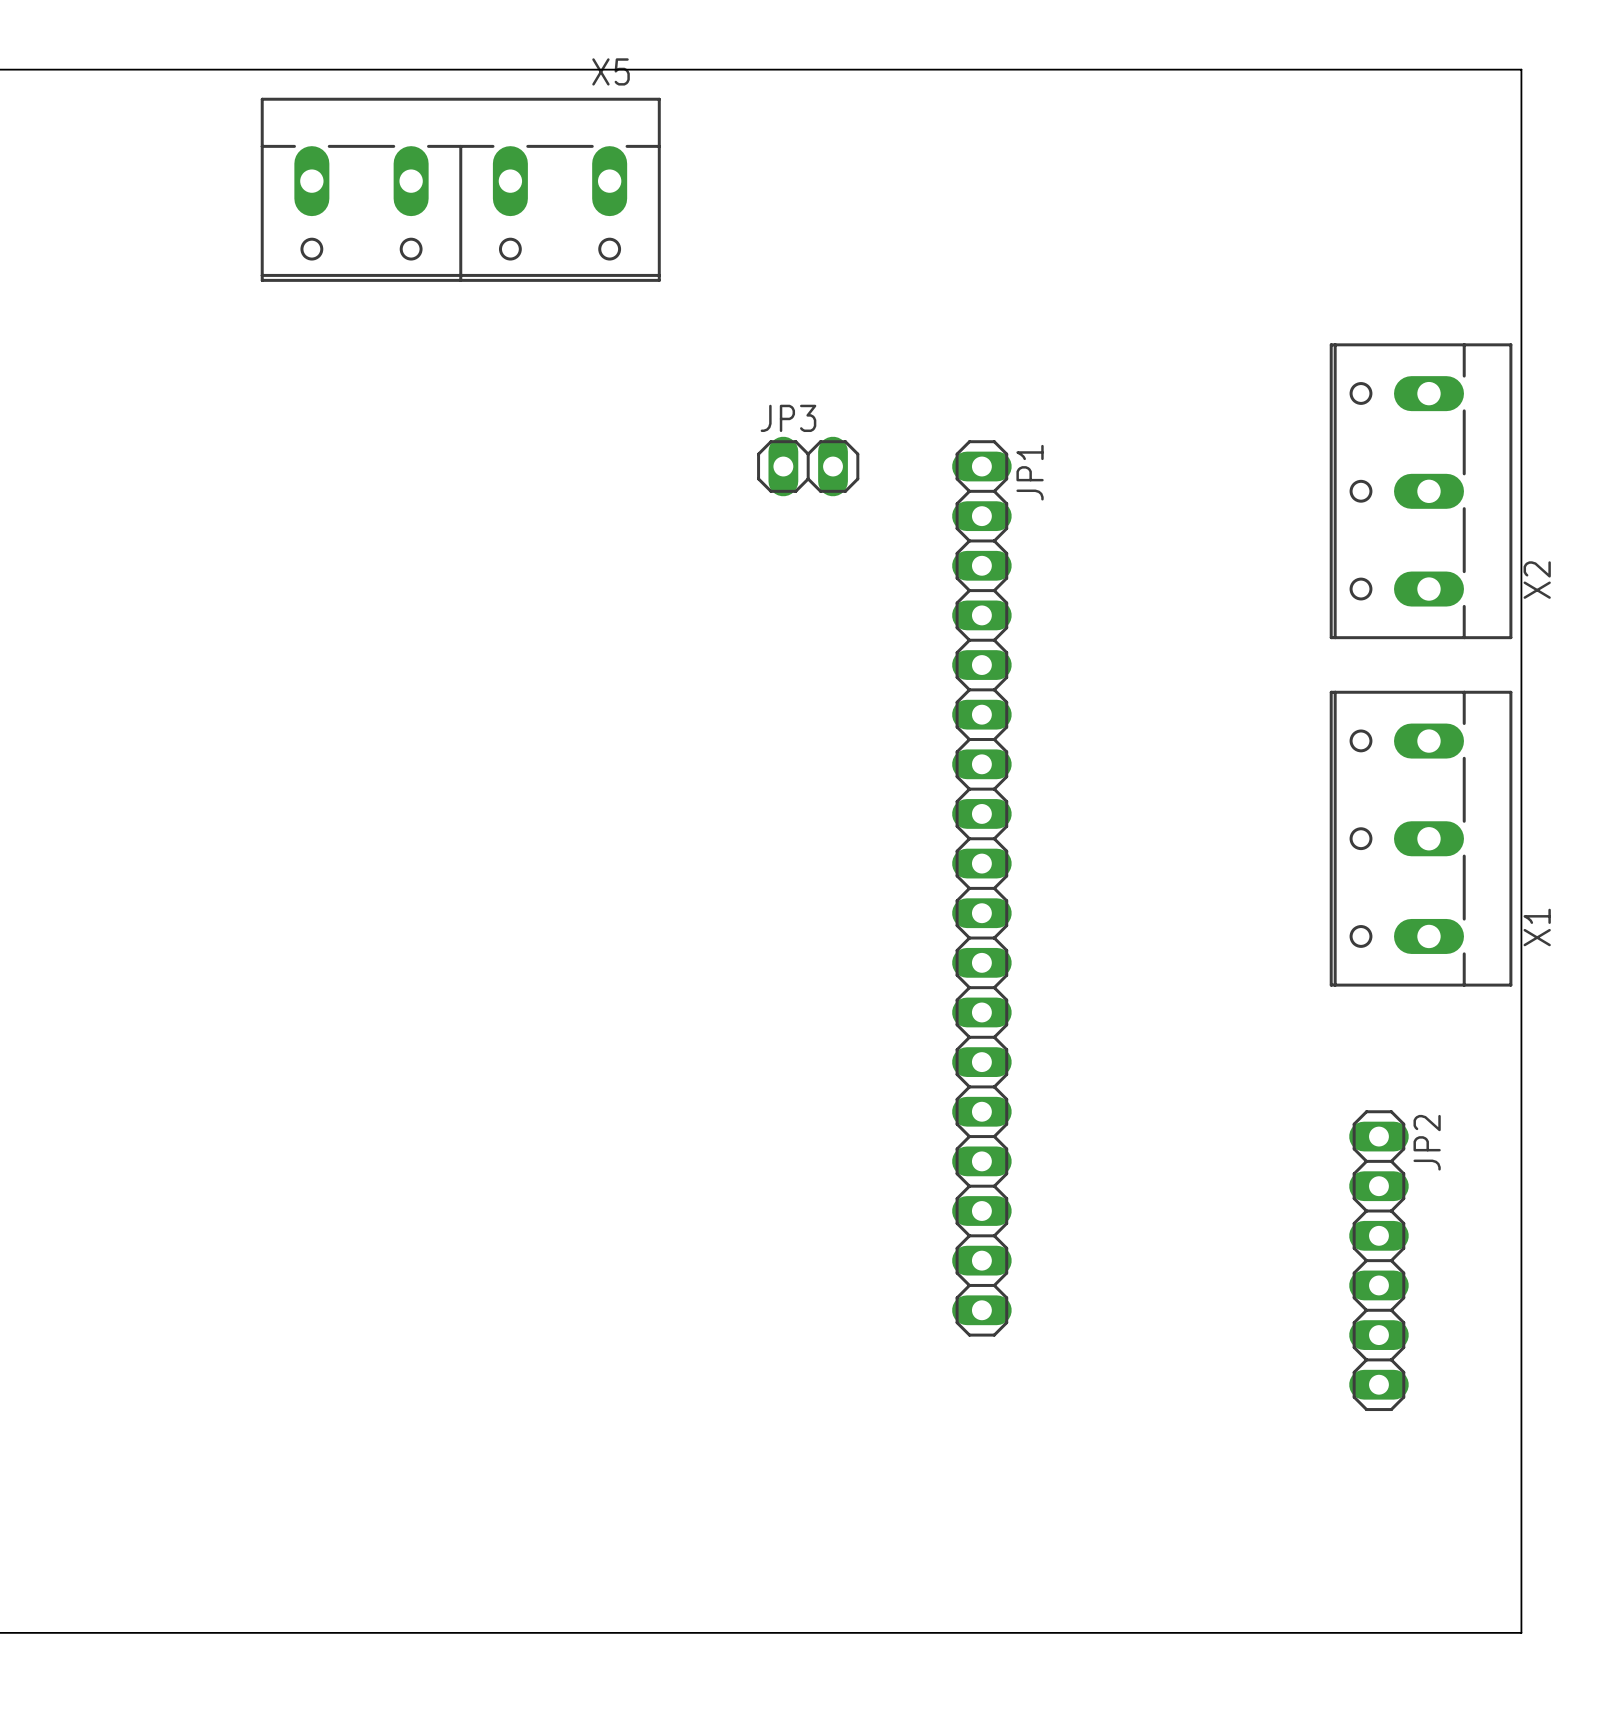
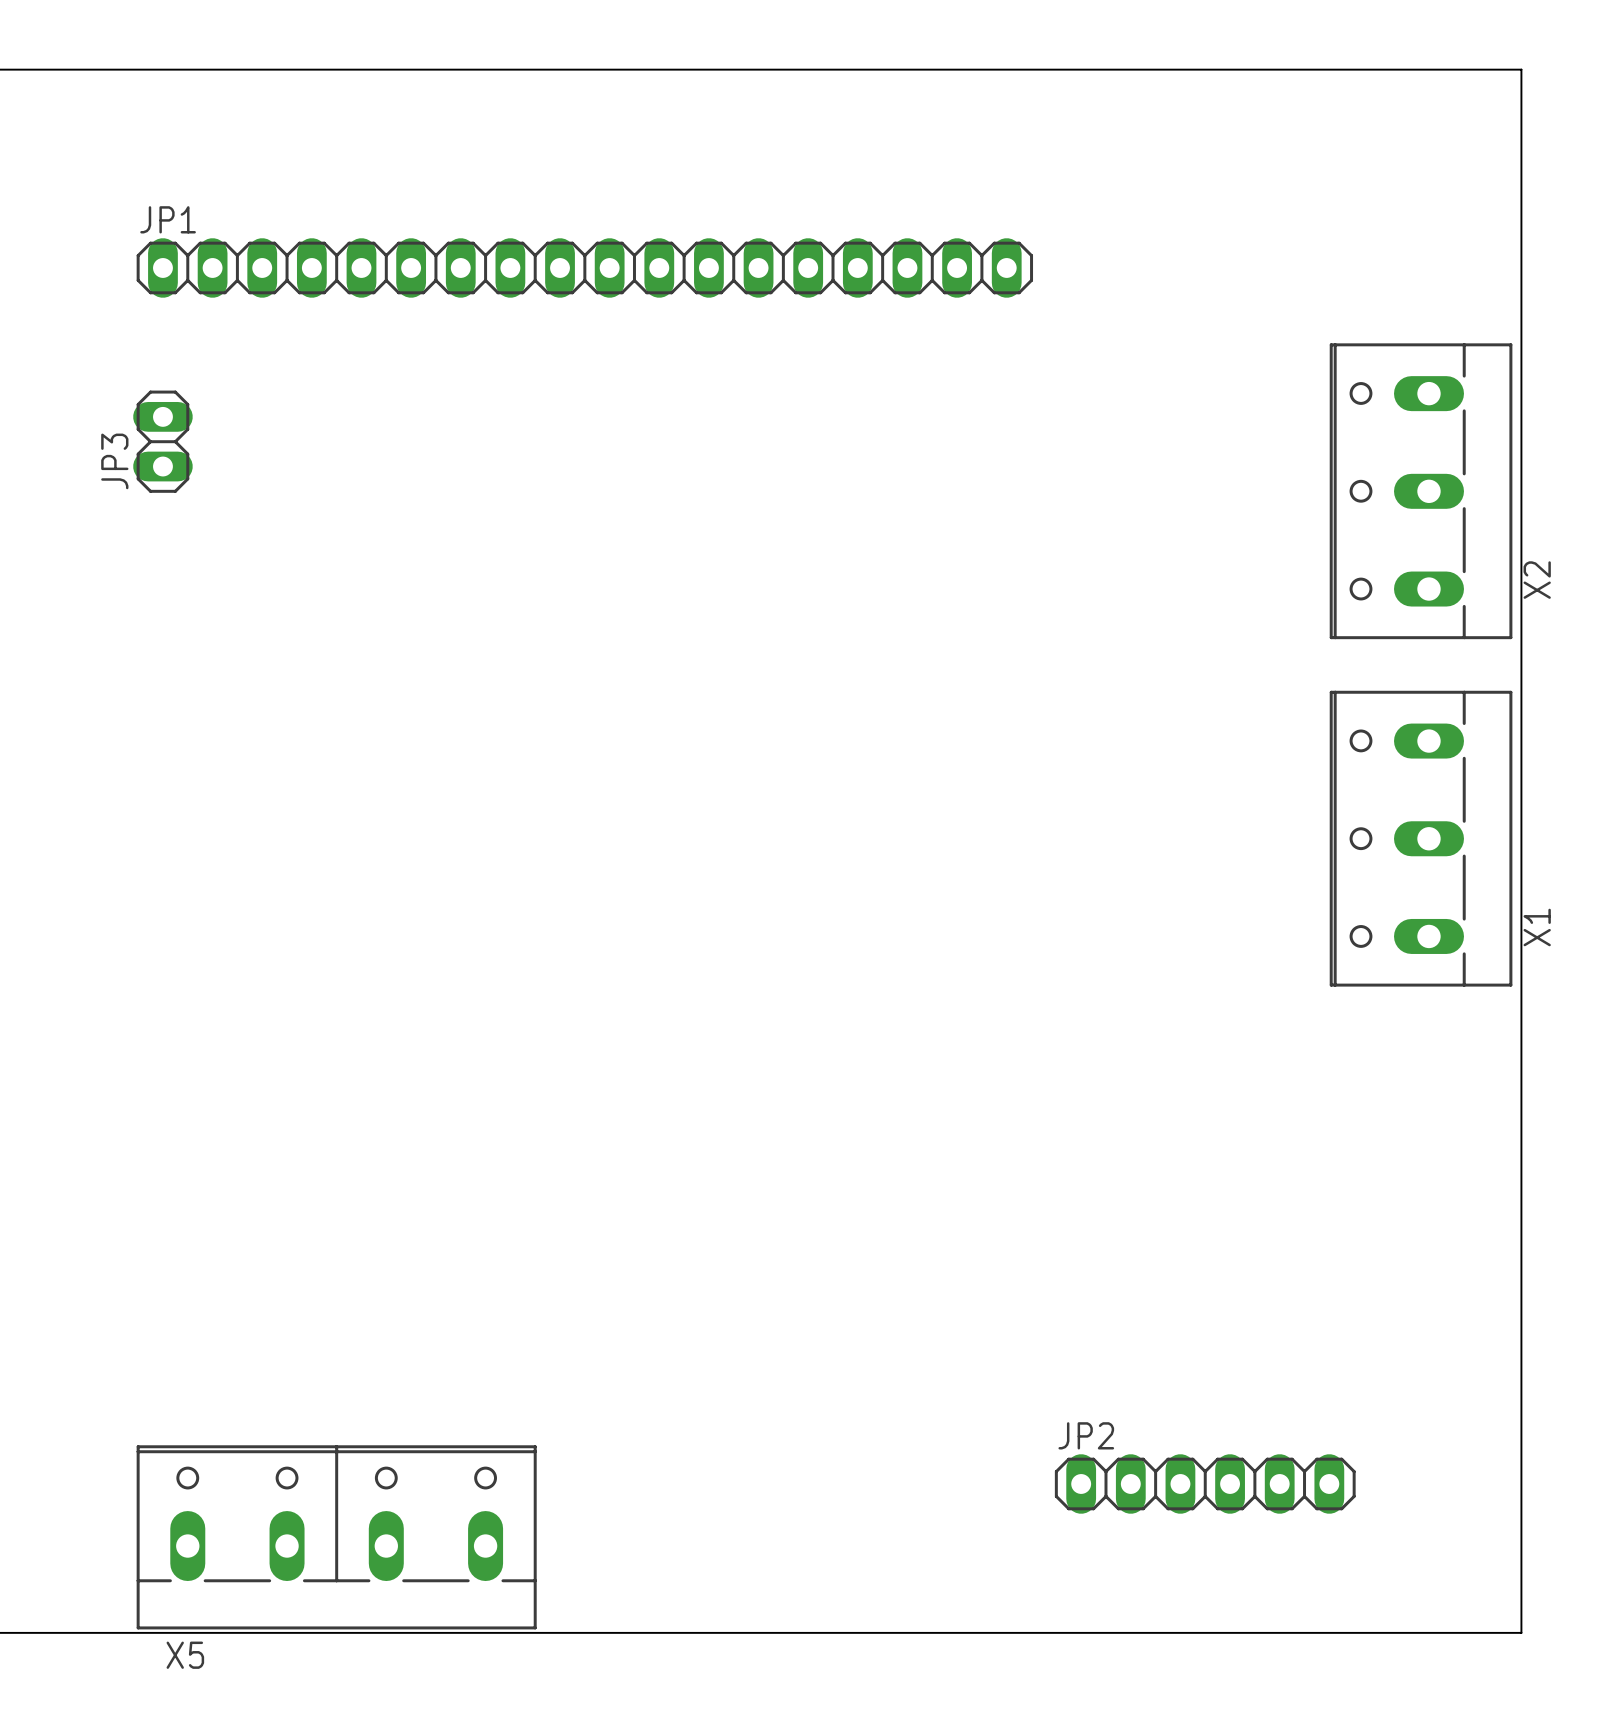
X5 rotation: 0° (460, 189) -> 180° (336, 1537)
X5 position: (460, 189) -> (336, 1537)
JP3 name position: JP3 (788, 418) -> JP3 (114, 461)
JP3 rotation: 0° (808, 466) -> 90° clockwise (162, 441)
JP3 position: (808, 466) -> (162, 441)
JP1 name position: JP1 (1030, 472) -> JP1 (168, 219)
JP1 rotation: 0° (981, 888) -> 90° clockwise (584, 267)
JP1 position: (981, 888) -> (584, 267)
JP2 name position: JP2 (1427, 1142) -> JP2 (1086, 1435)
JP2 rotation: 0° (1378, 1260) -> 90° clockwise (1205, 1483)
JP2 position: (1378, 1260) -> (1205, 1483)

